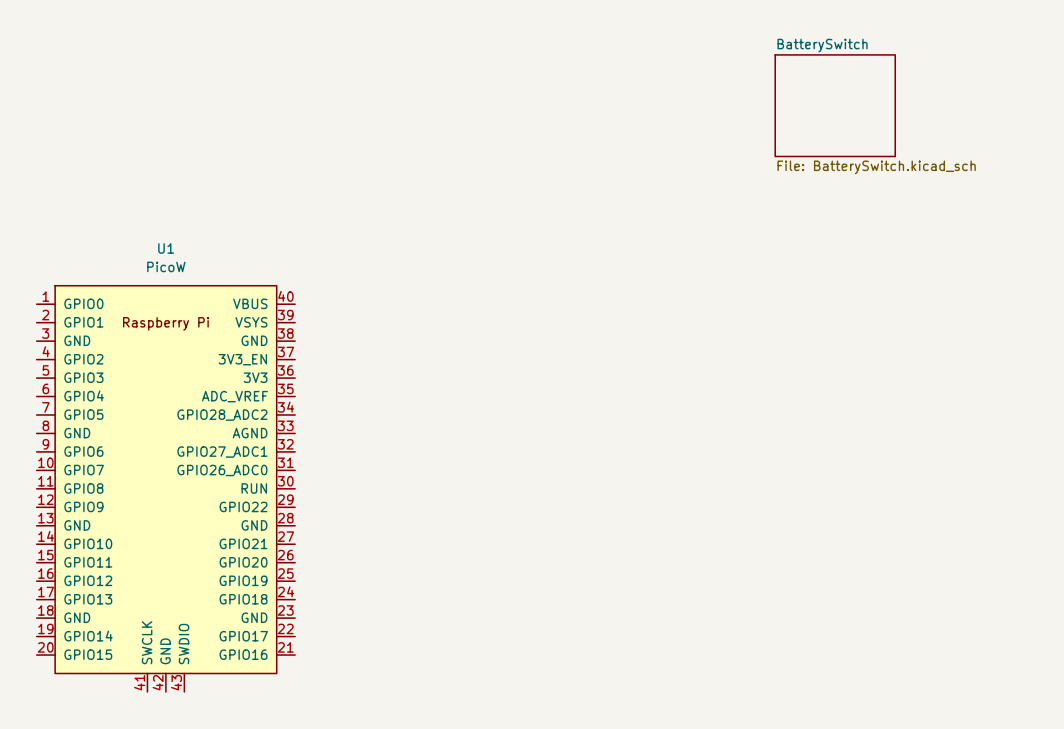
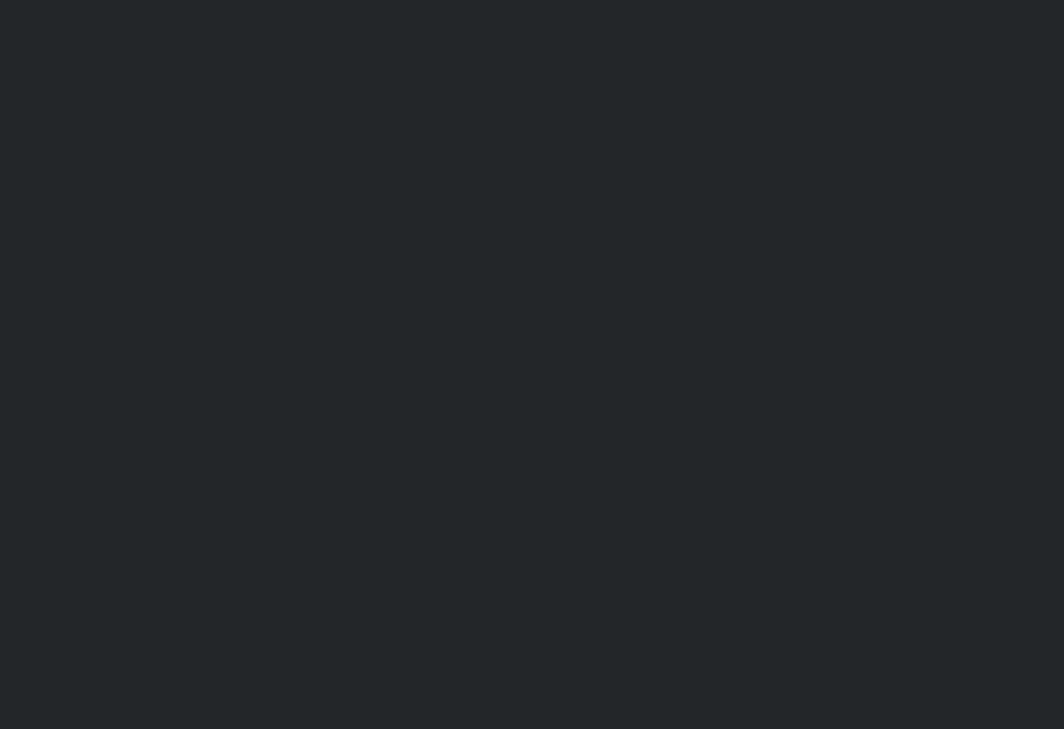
sheet BatterySwitch: File: BatterySwitch.kicad_sch (835, 105) -> none
U1: PicoW (165, 488) -> none

